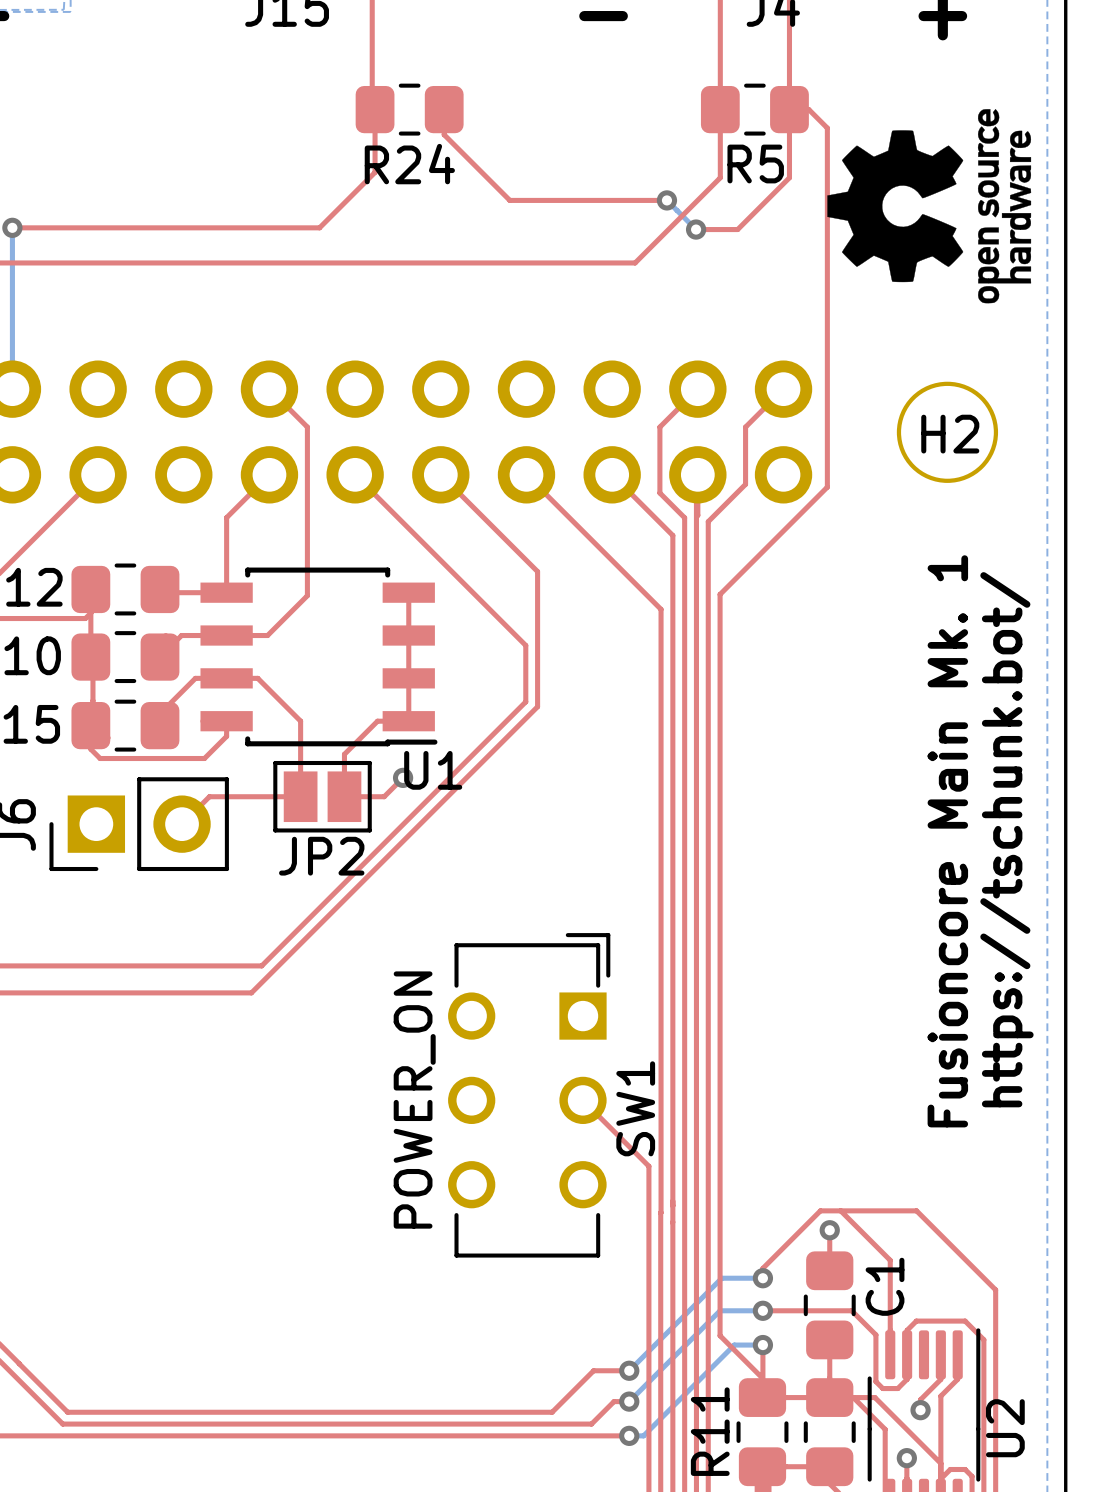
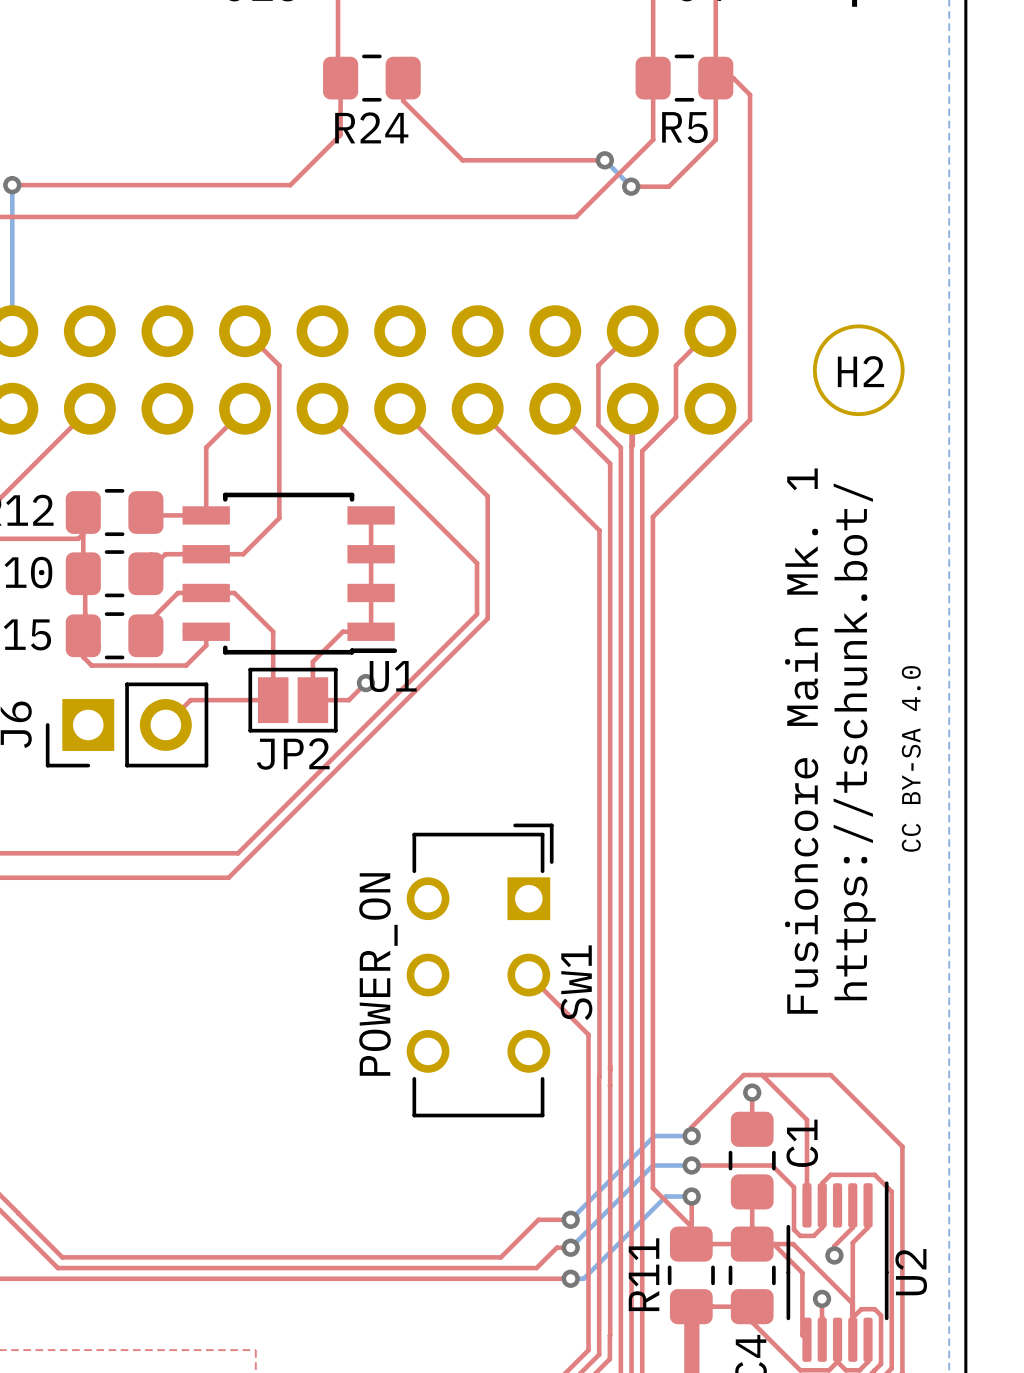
drawing: [827, 109, 1032, 304] -> none
text: https://tschunk.bot/ (1006, 839) -> CC BY-SA 4.0 (911, 758)
text: Fusioncore Main Mk. 1 (947, 841) -> https://tschunk.bot/ (854, 741)
text: none -> Fusioncore Main Mk. 1 (801, 741)

